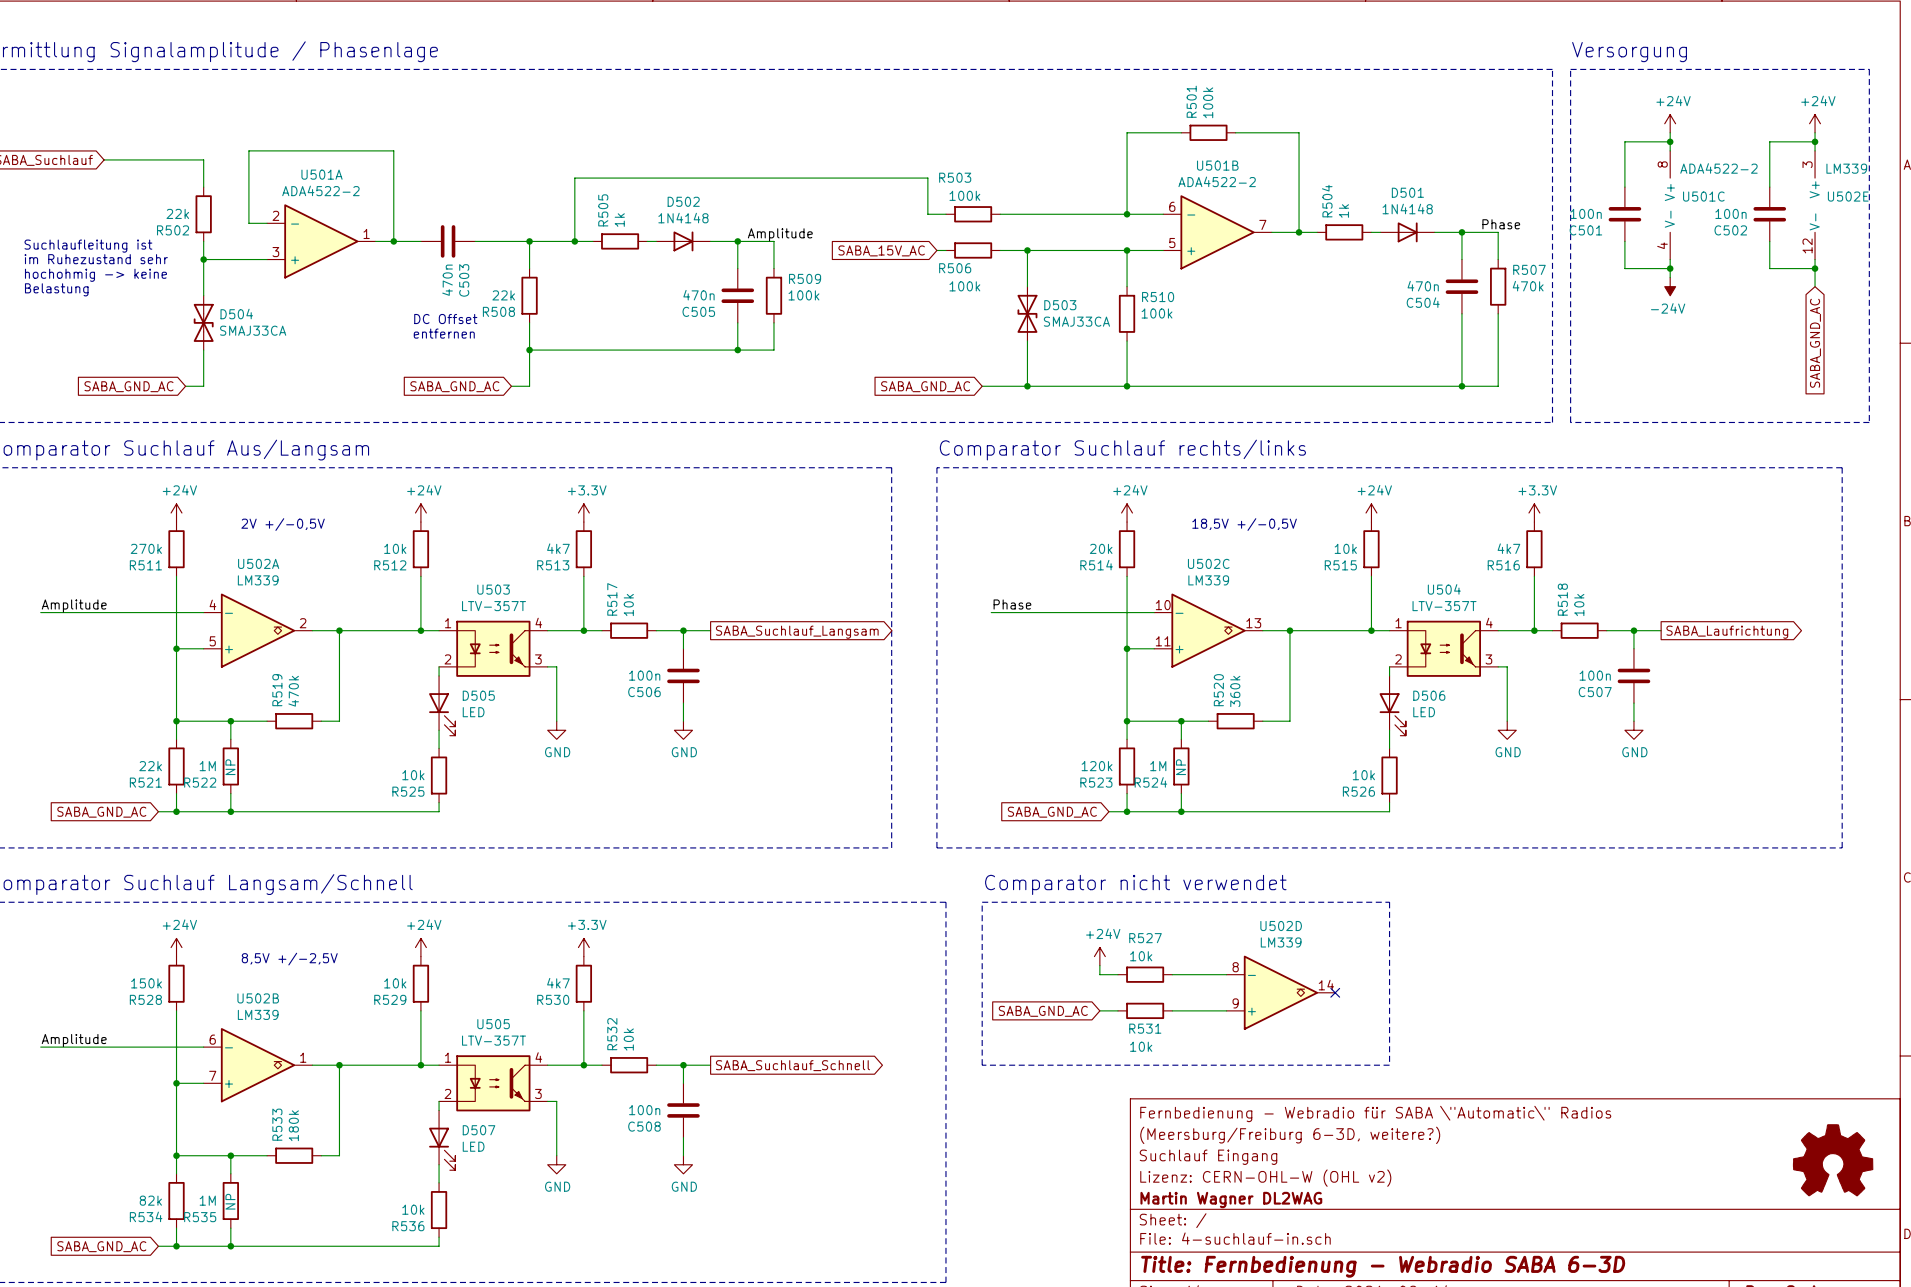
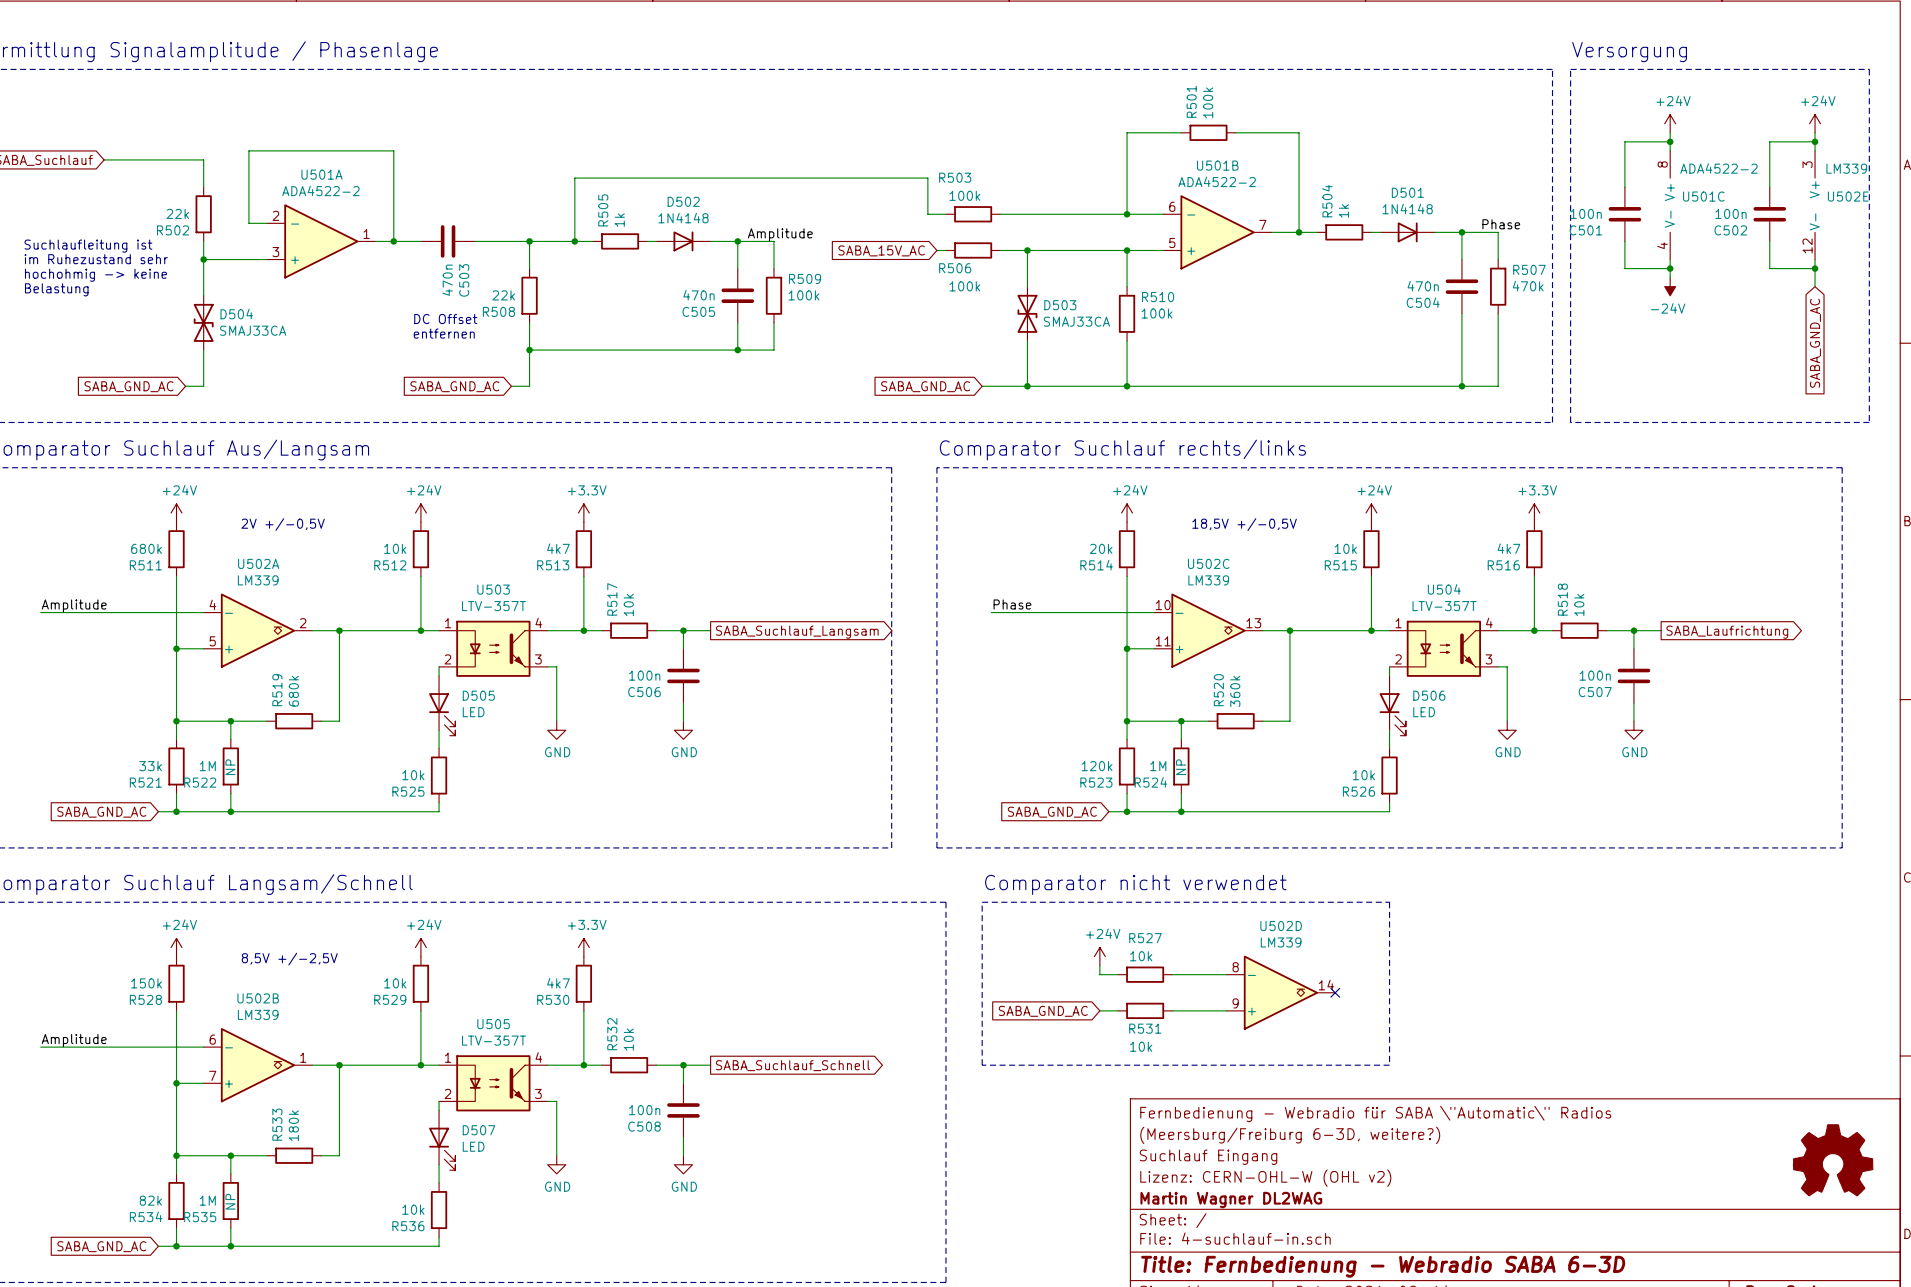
R511 value: 270k (146, 548) -> 680k (146, 548)
R519 value: 470k (293, 691) -> 680k (293, 691)
R521 value: 22k (150, 766) -> 33k (150, 766)

